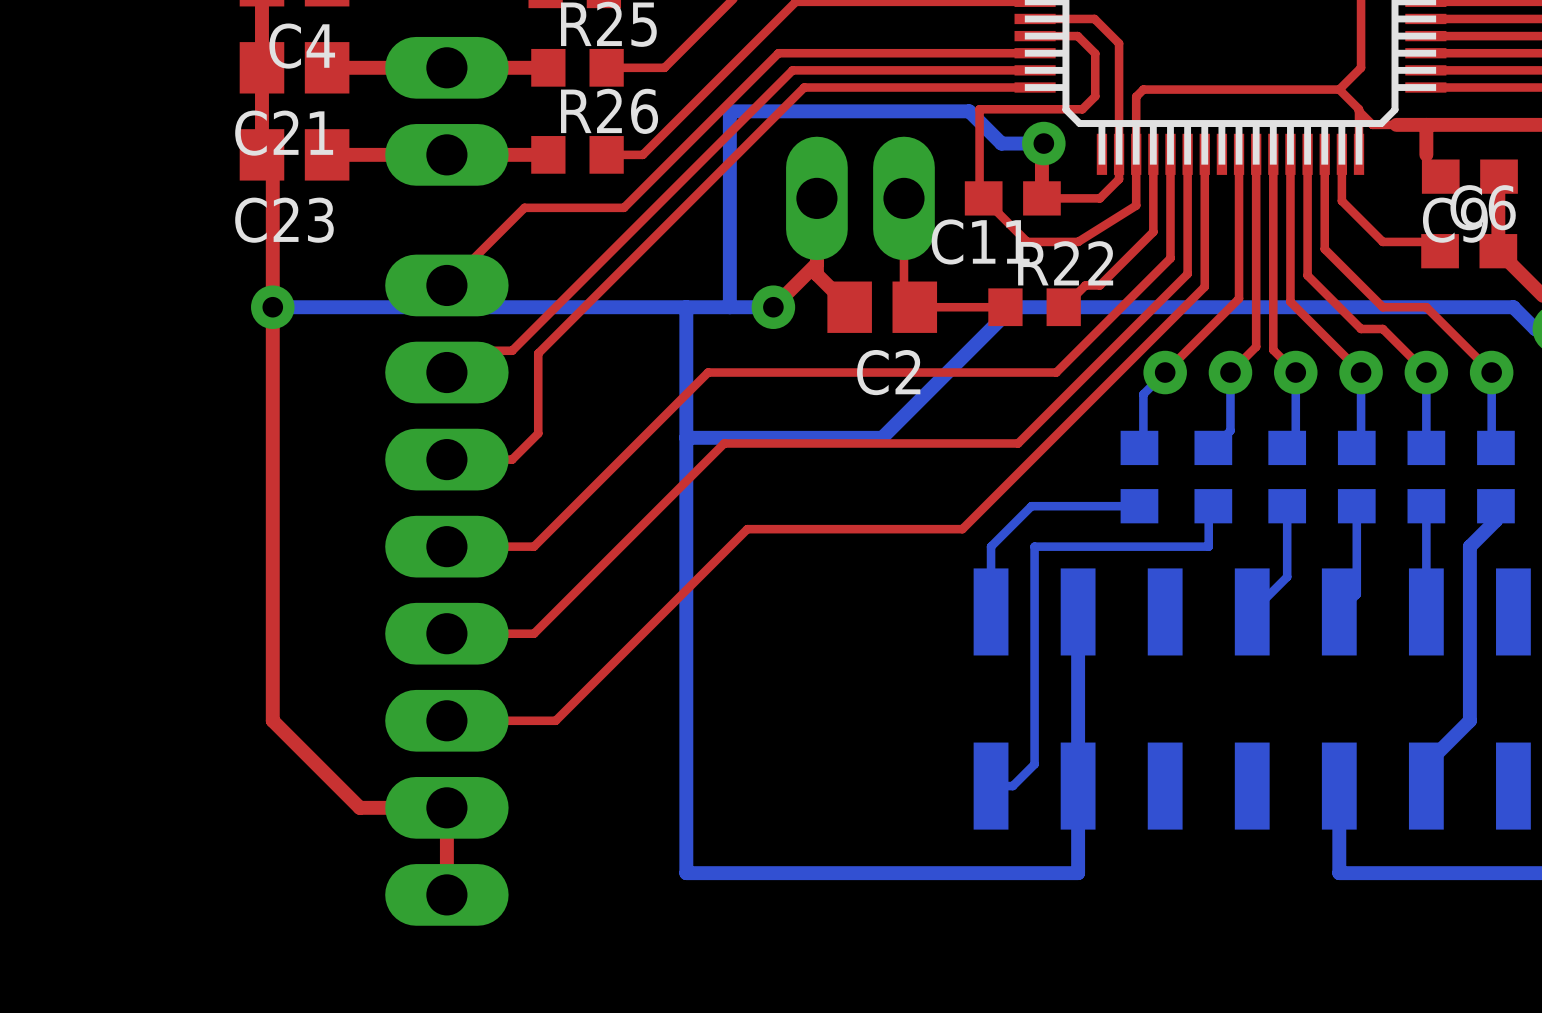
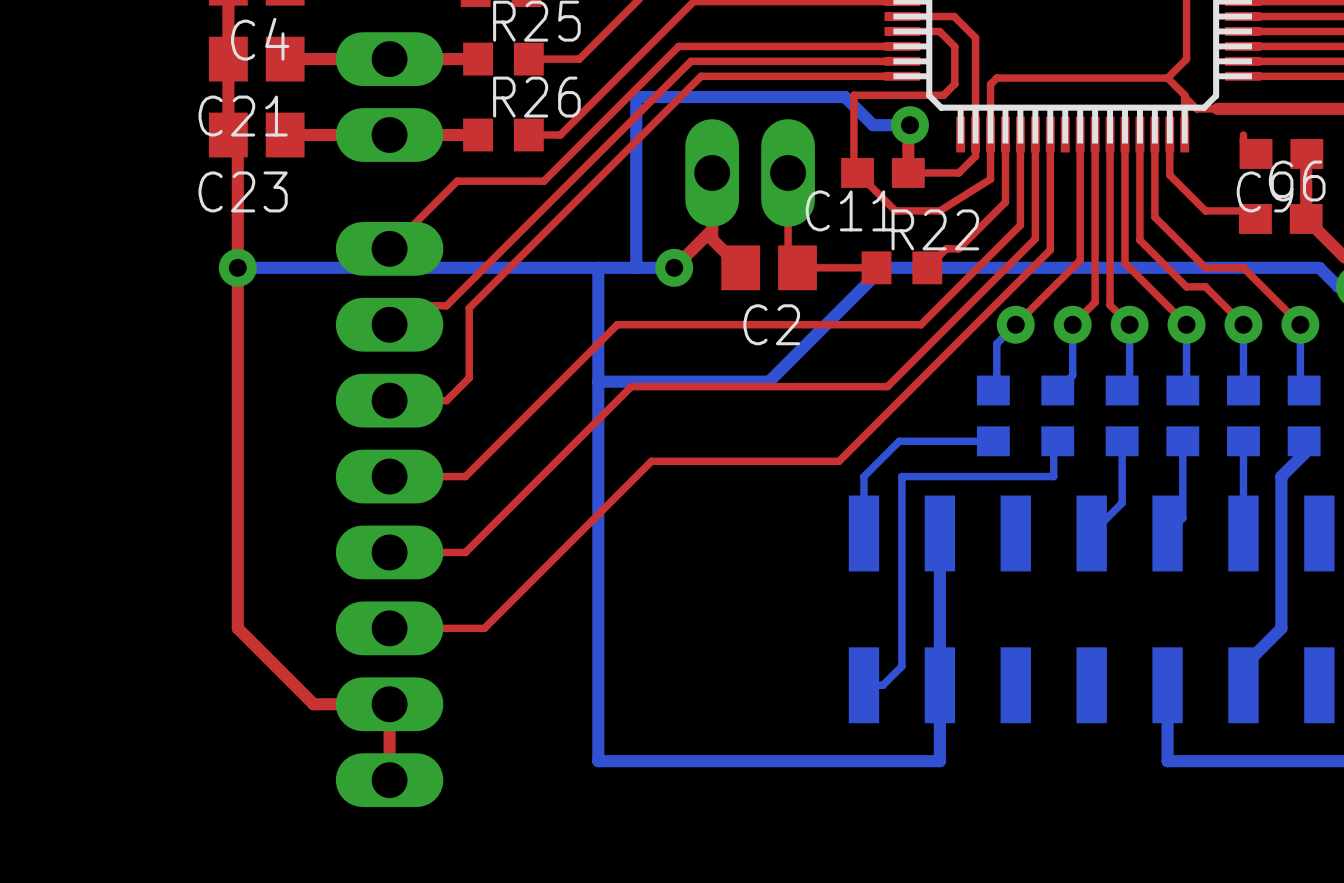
top track: (1426, 124) (1426, 154) -> none

